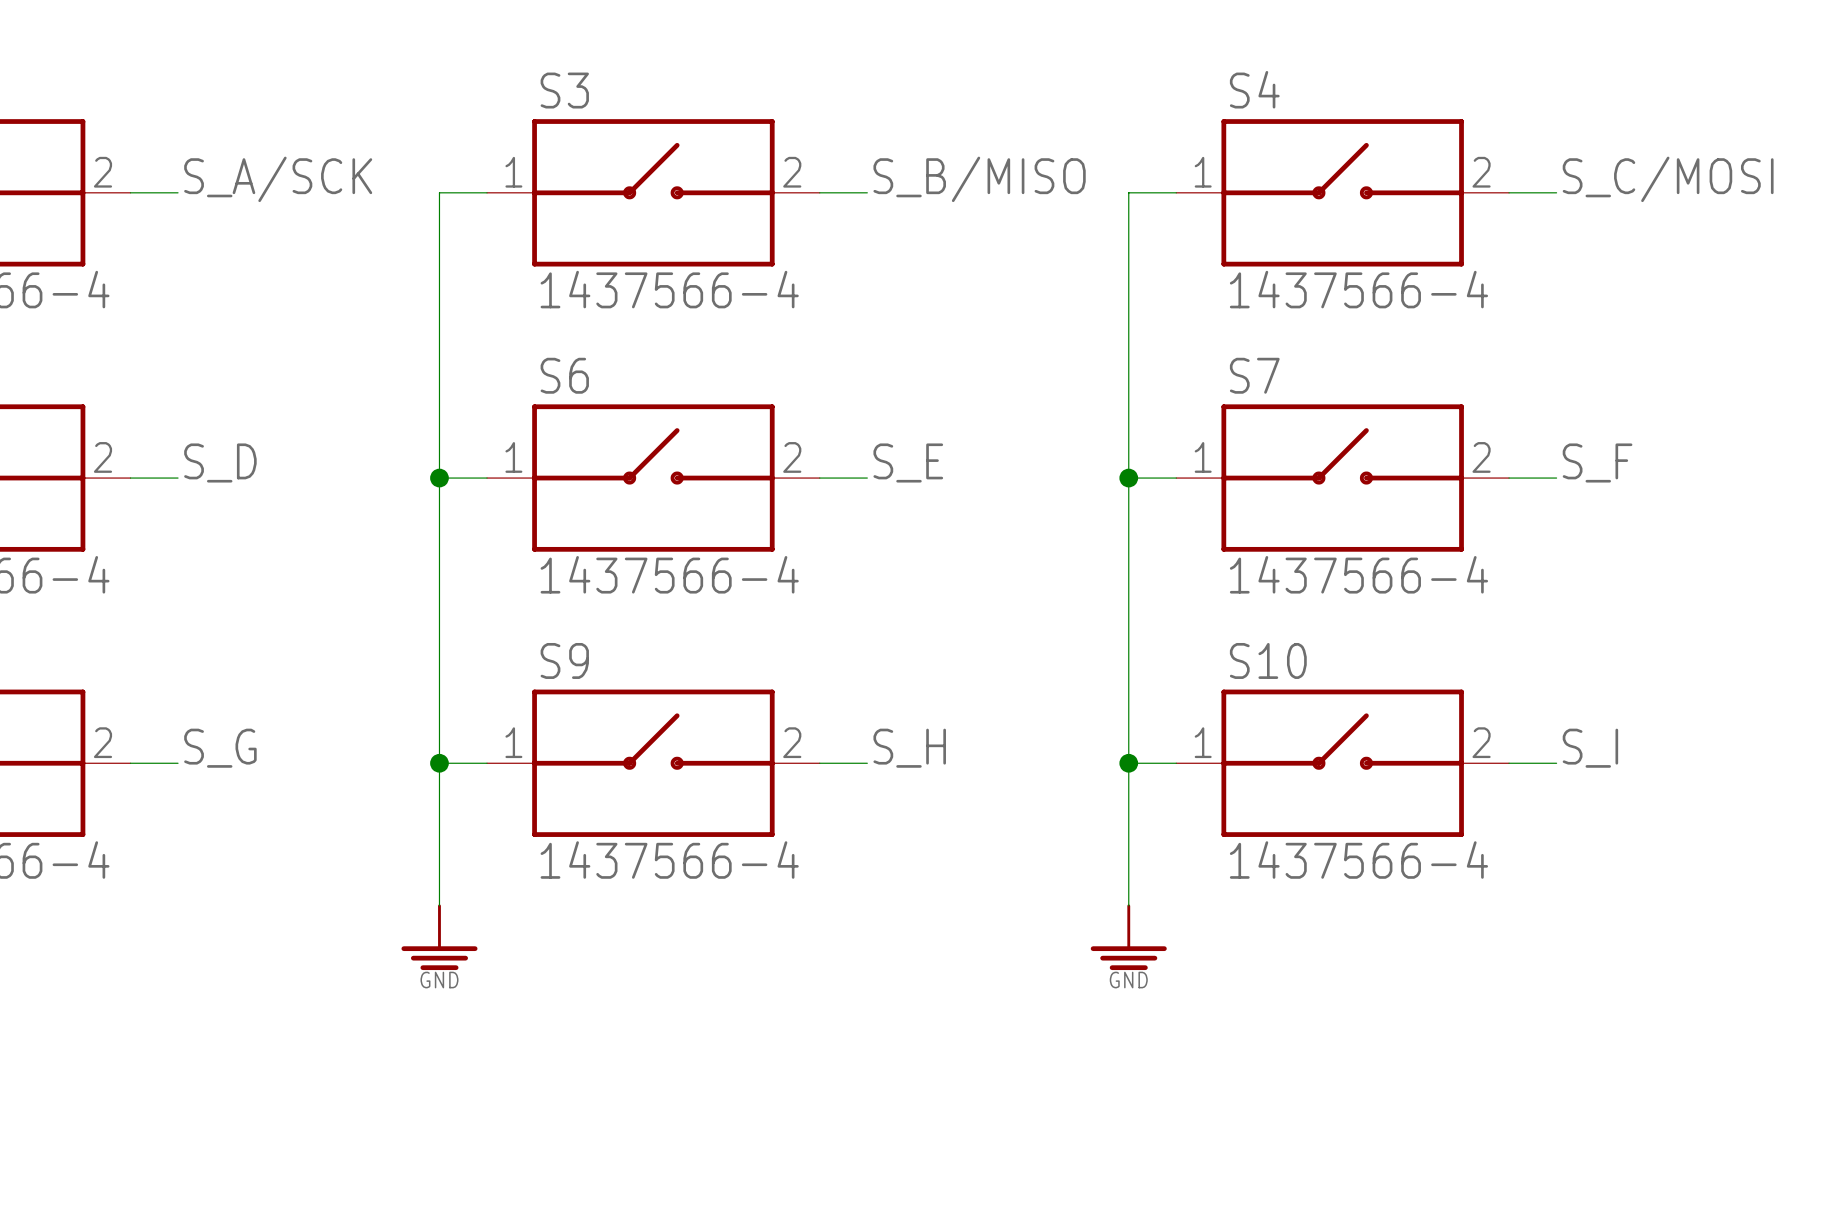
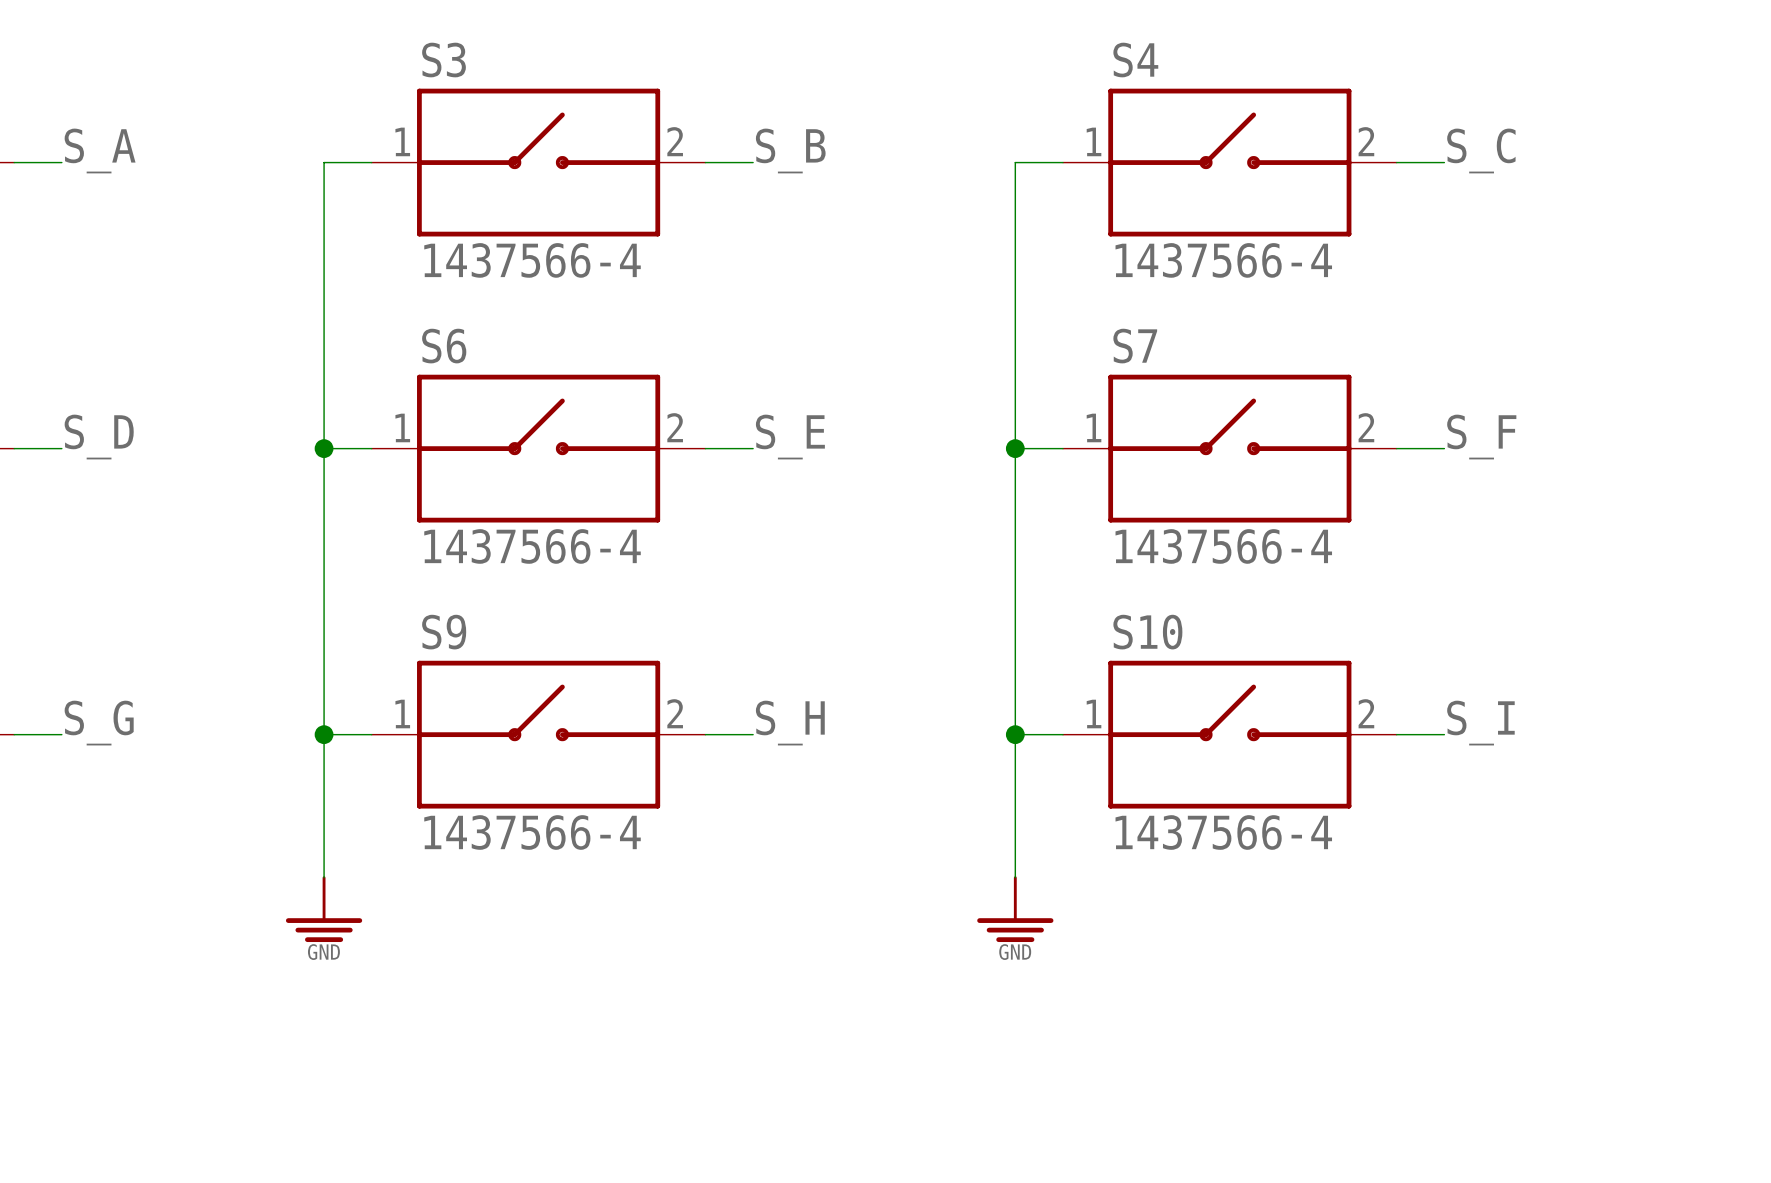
label: S_A/SCK (278, 179) -> S_A (100, 150)
label: S_B/MISO (979, 179) -> S_B (790, 150)
label: S_C/MOSI (1668, 179) -> S_C (1481, 150)

